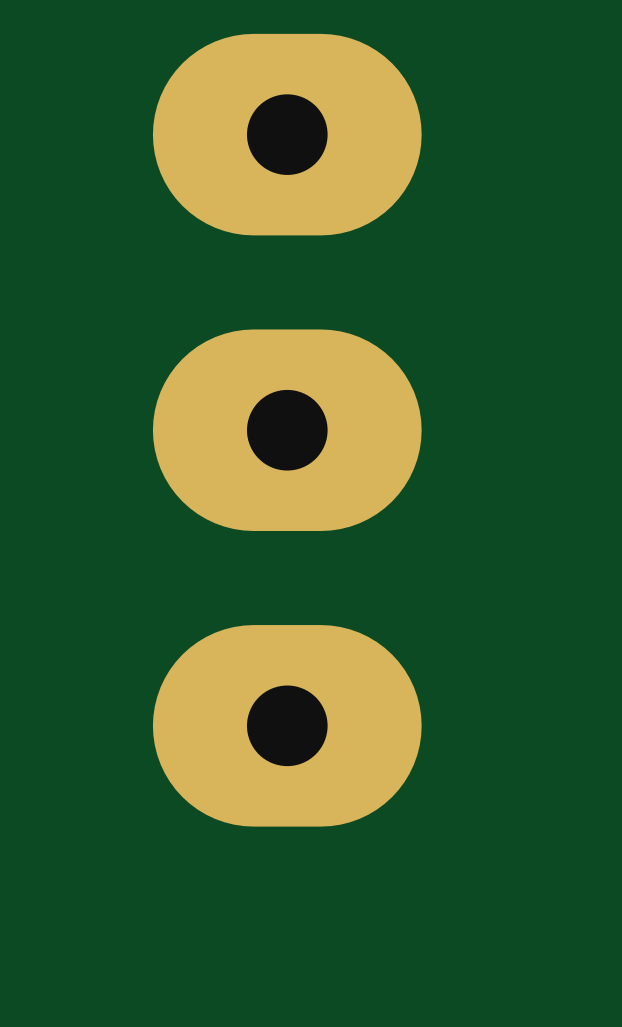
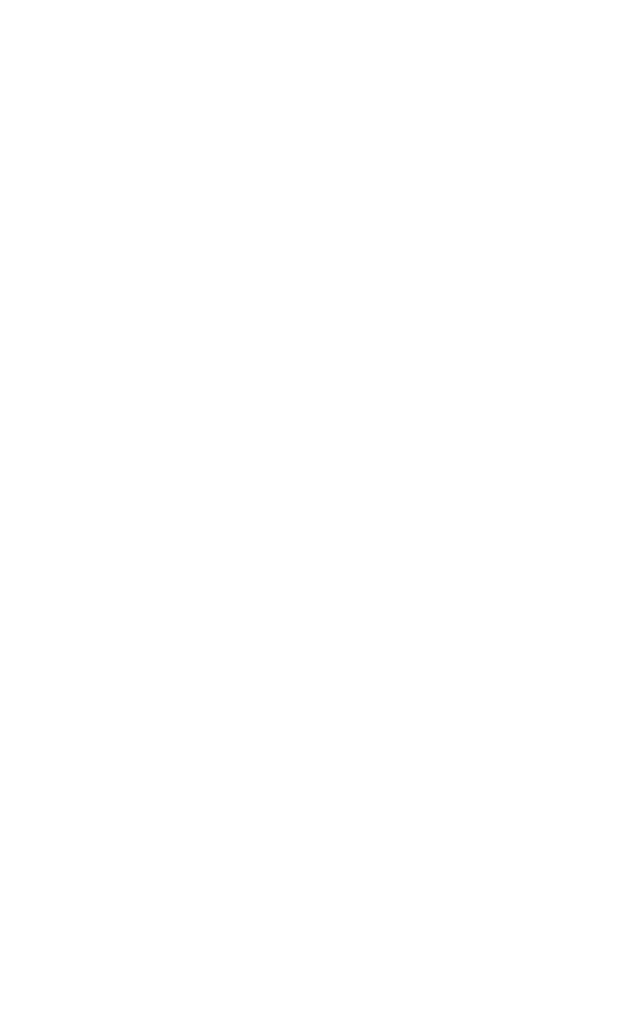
part: (287, 430) -> none

